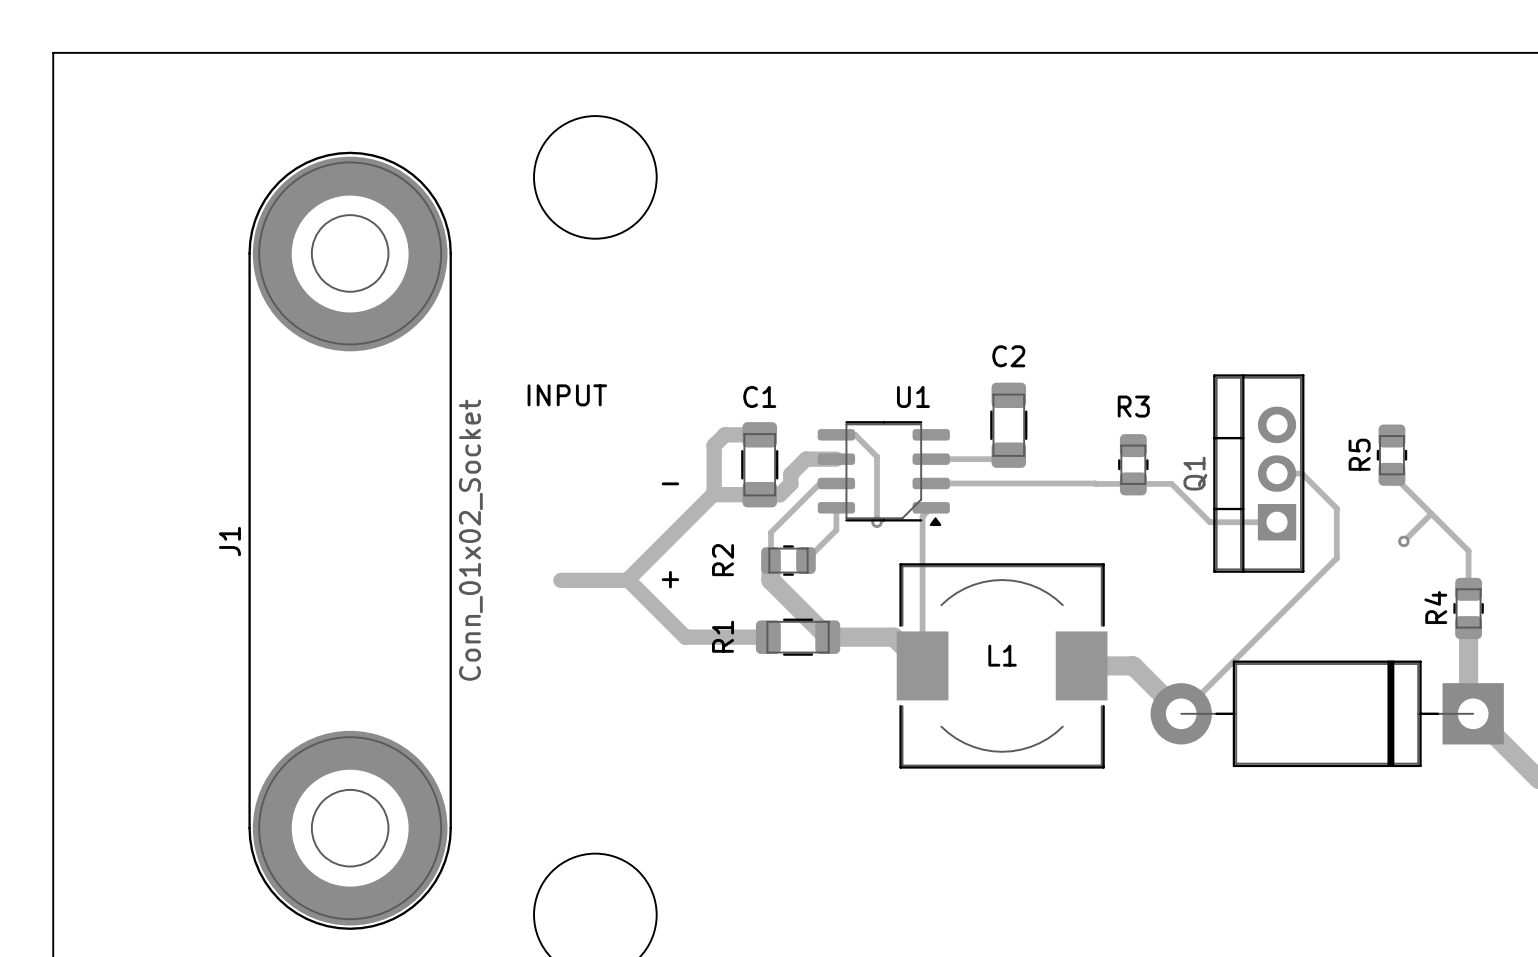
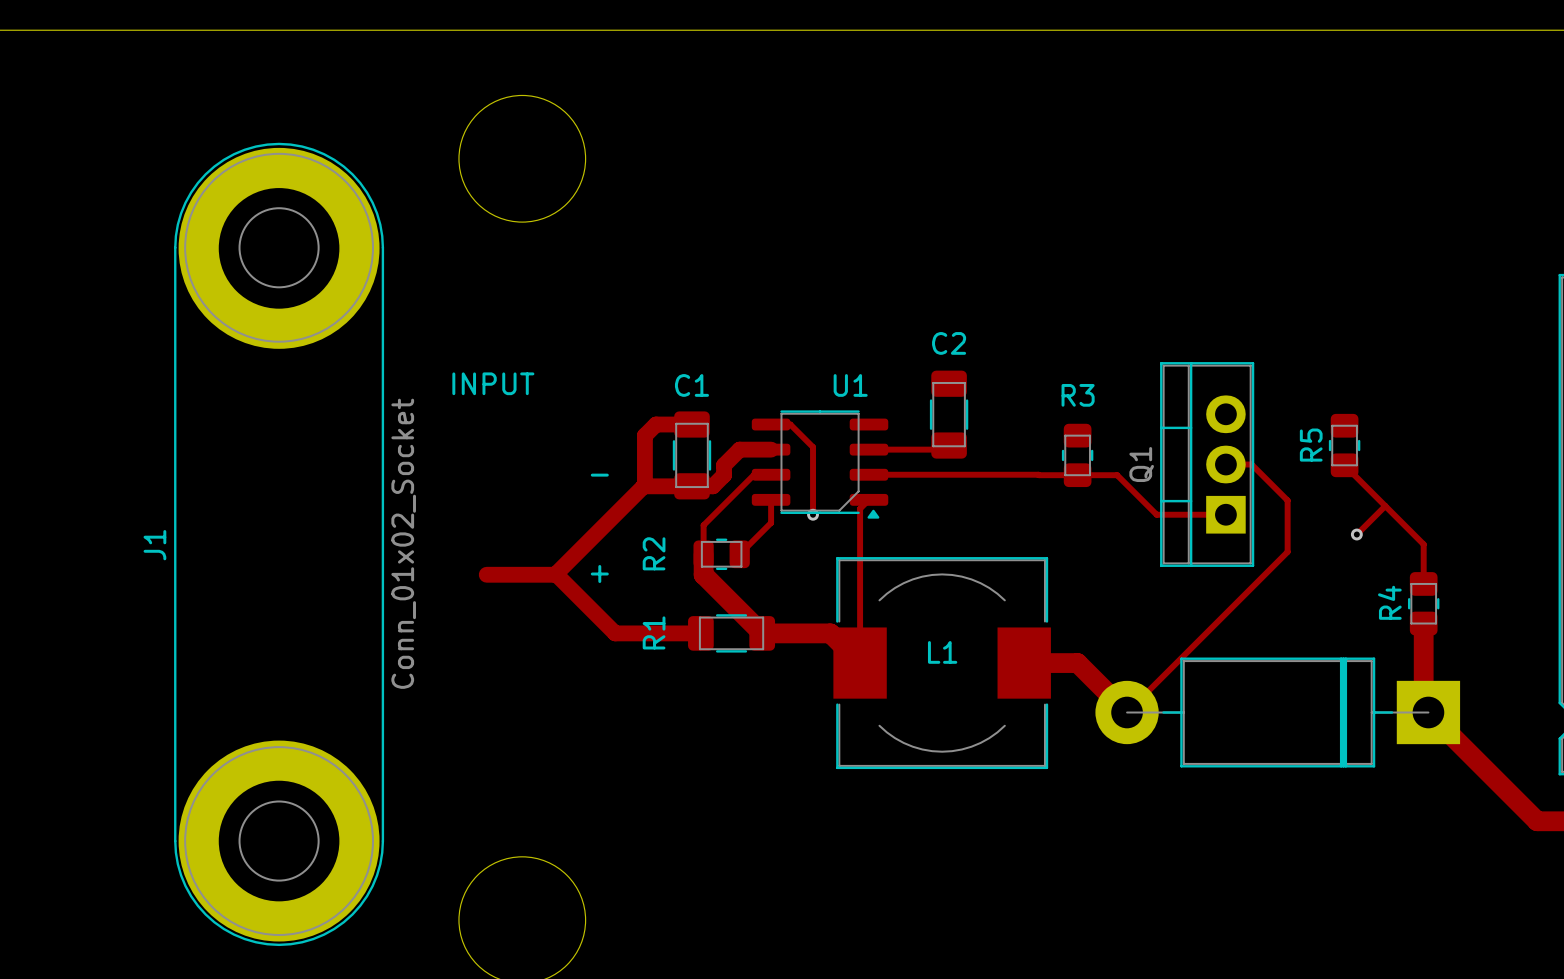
J1 position: (350, 540) -> (279, 544)

